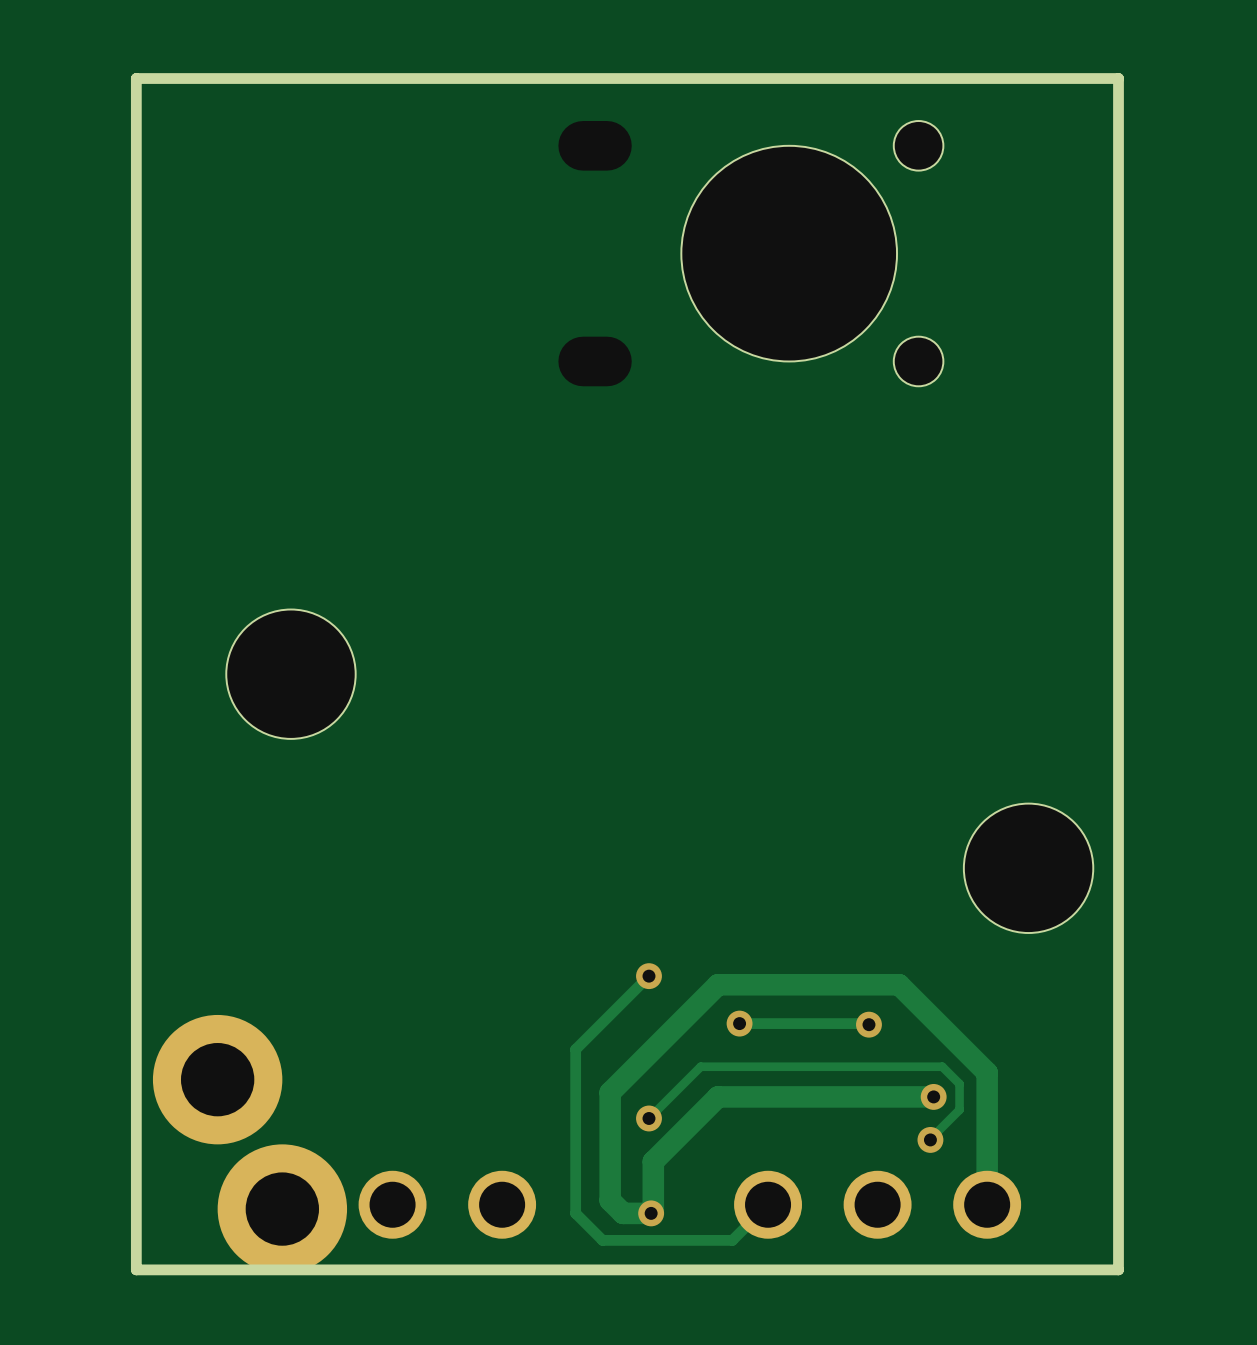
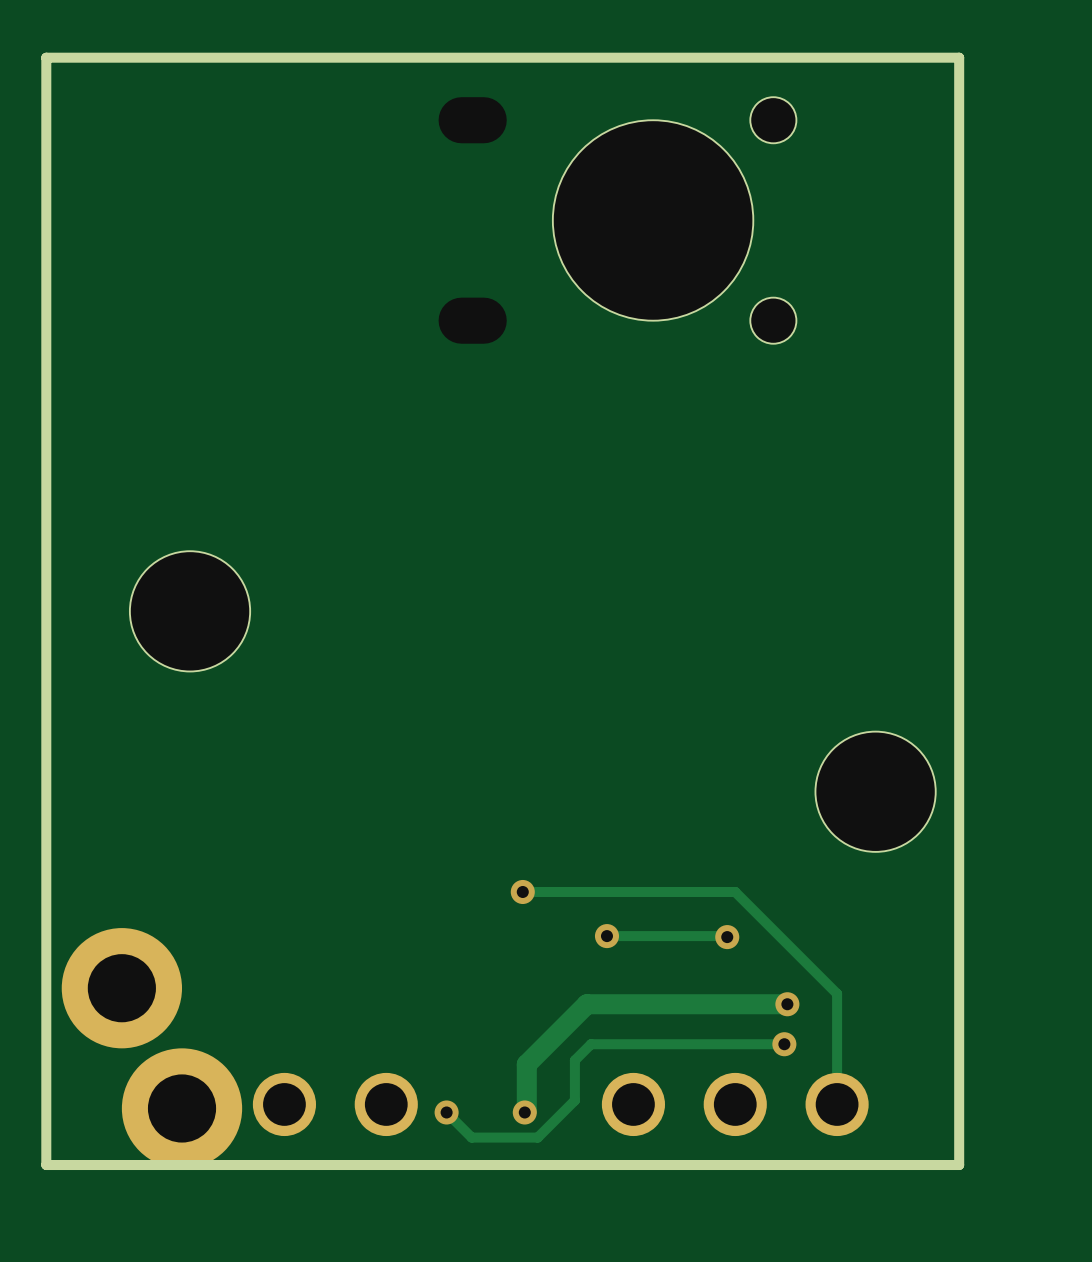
track: (648, 976) (575, 1049) (575, 1213) (602, 1240) -> (446, 1112) (471, 1137) (479, 1137)
track: (987, 1085) (987, 1072) (899, 984) (718, 984) (610, 1092) (610, 1200) (623, 1213) (651, 1213) -> (837, 993) (735, 891) (522, 891)
track width: thick (987, 1085) (987, 1204) -> thin (837, 993) (837, 1104)
track: (648, 1118) (700, 1066) (942, 1066) (959, 1083) (959, 1109) (930, 1139) -> (537, 1137) (574, 1100) (574, 1060) (591, 1044) (784, 1044)
via position: (648, 1118) -> (446, 1112)
track: (768, 1204) (732, 1240) (665, 1240) -> none

